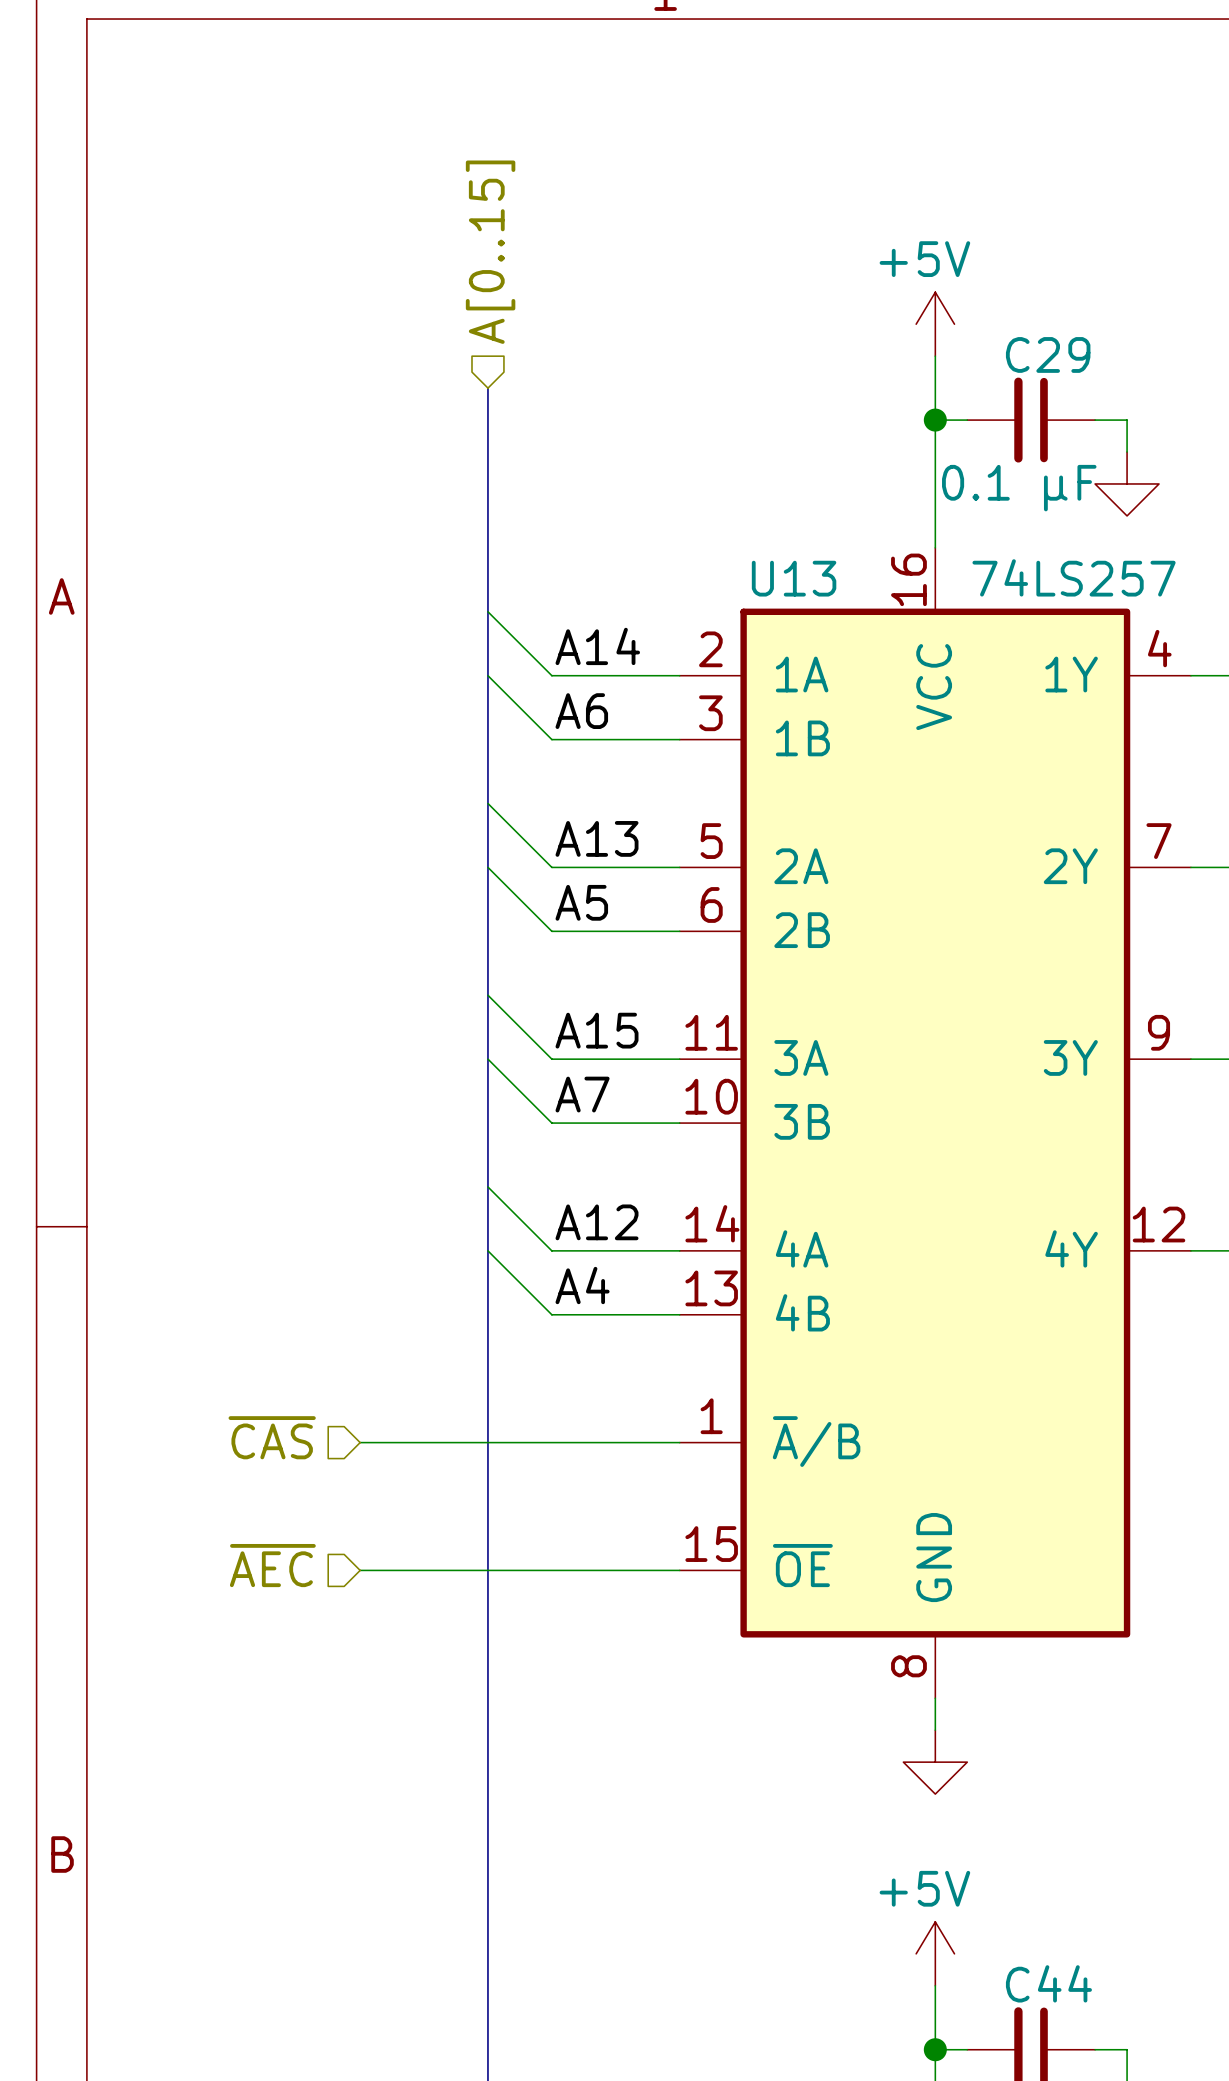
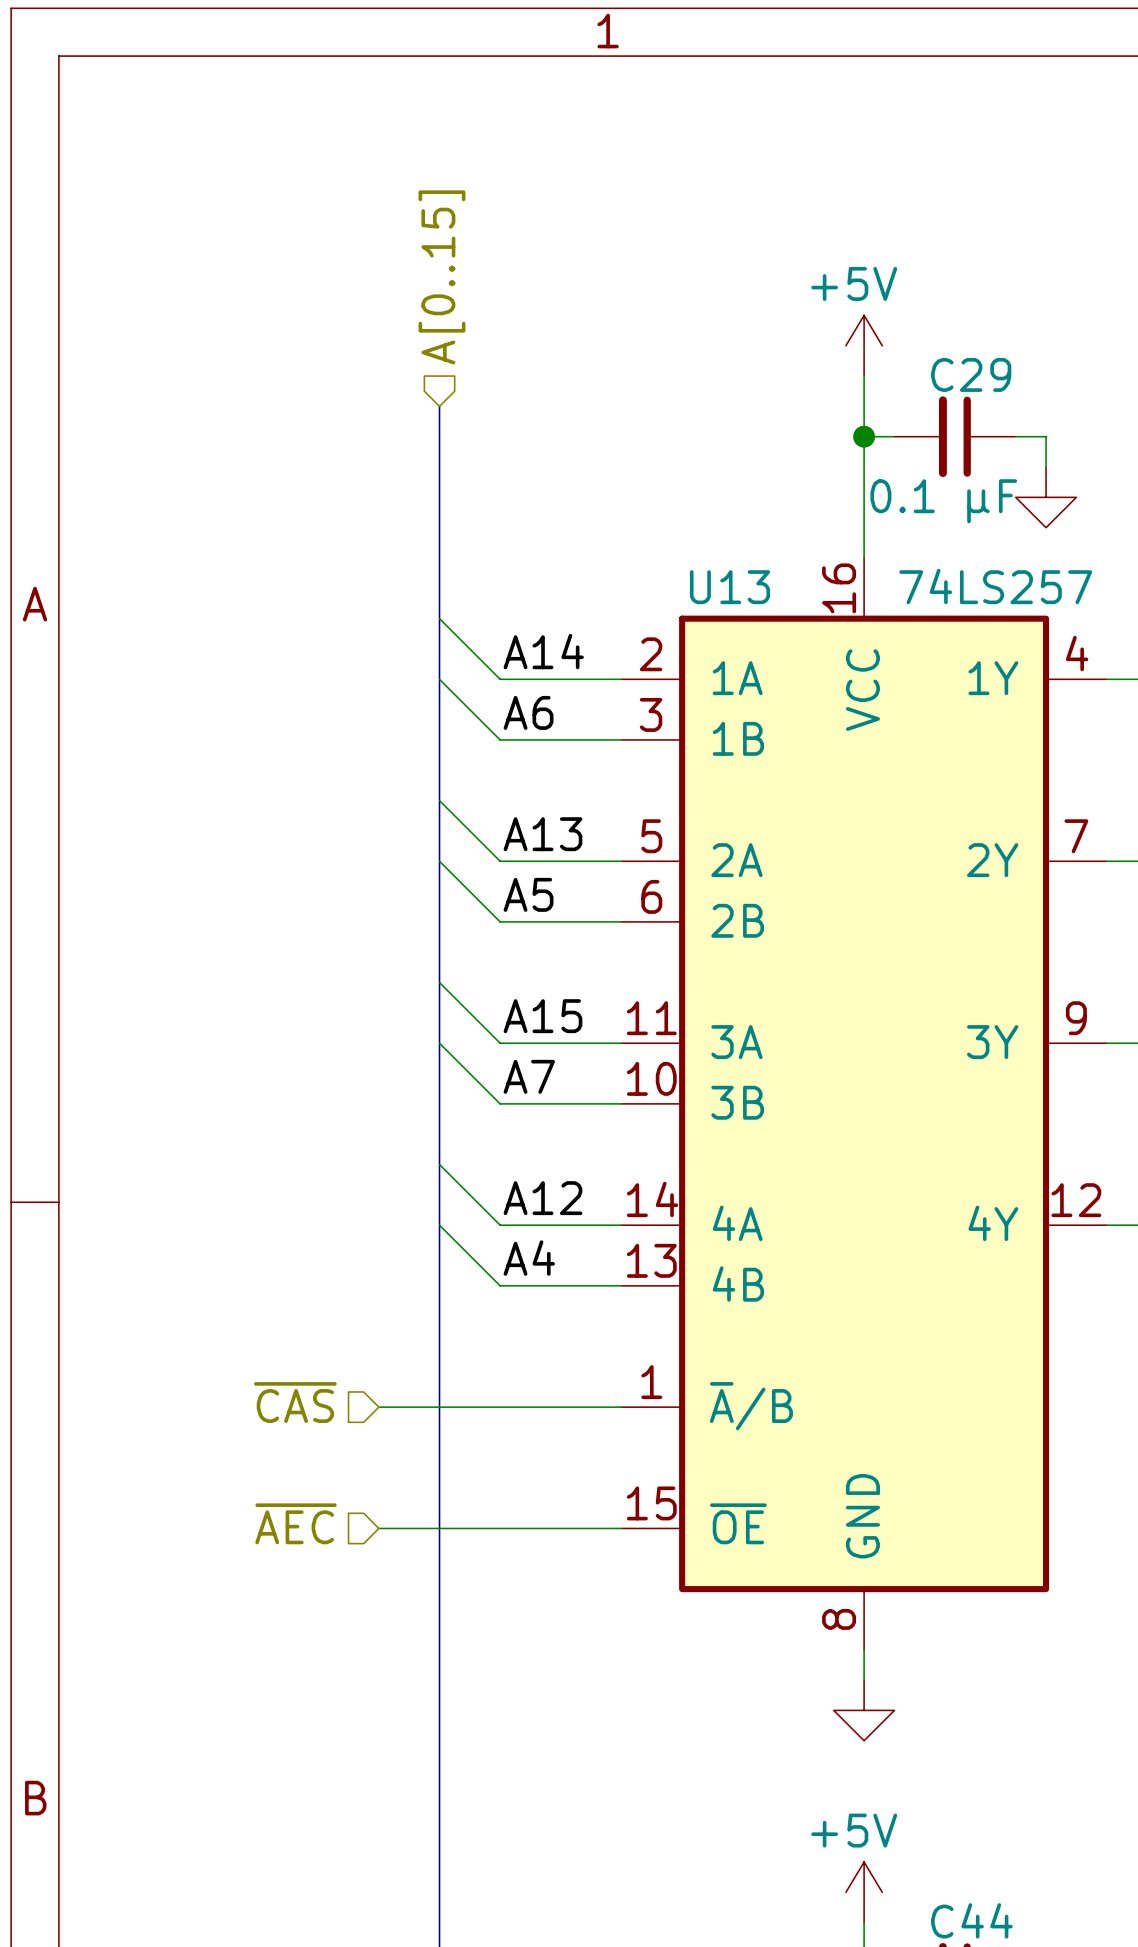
hierarchical label position: ~{CAS} (272, 1437) -> ~{CAS} (295, 1402)
wire: (360, 1442) (424, 1442) -> none
hierarchical label position: ~{AEC} (272, 1565) -> ~{AEC} (296, 1523)
wire: (360, 1570) (424, 1570) -> none

